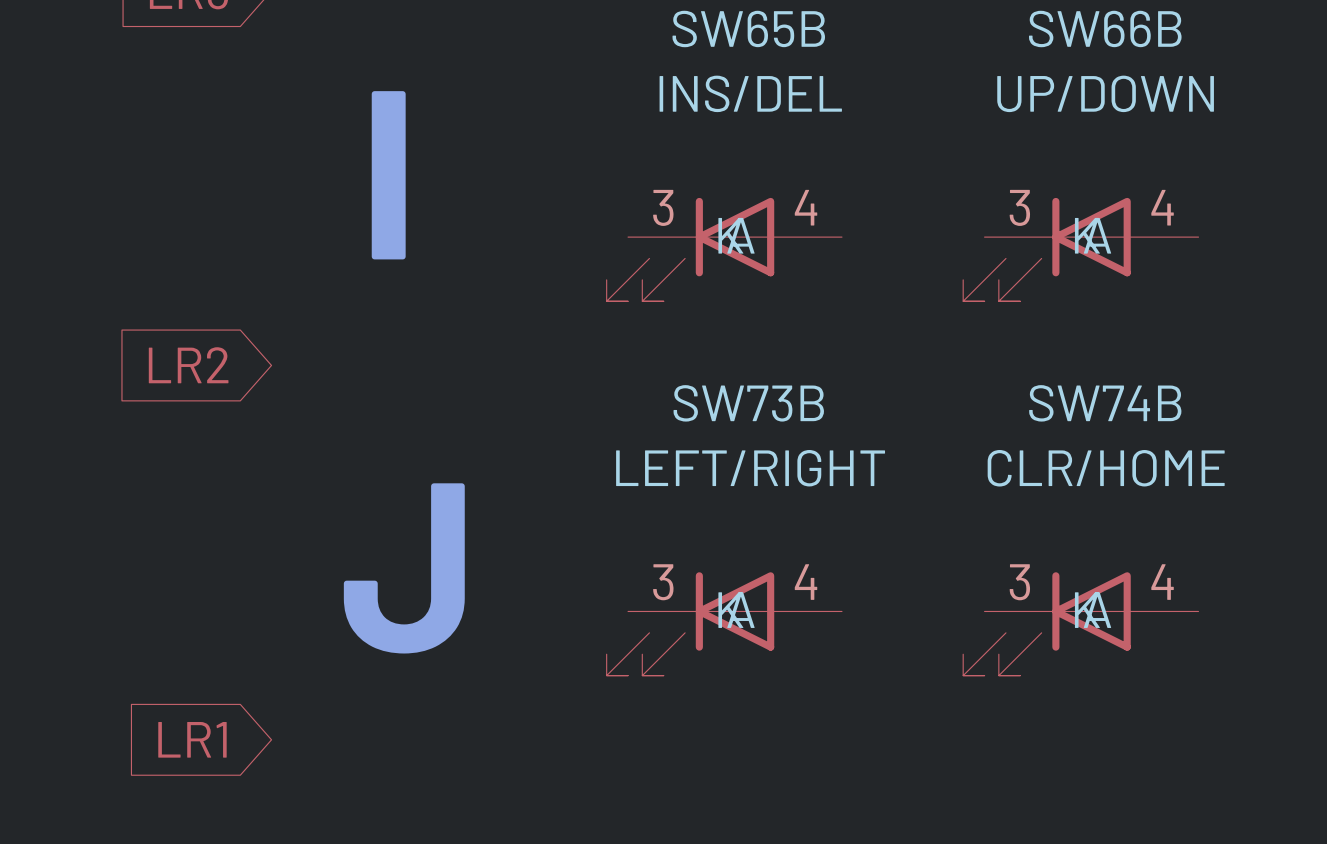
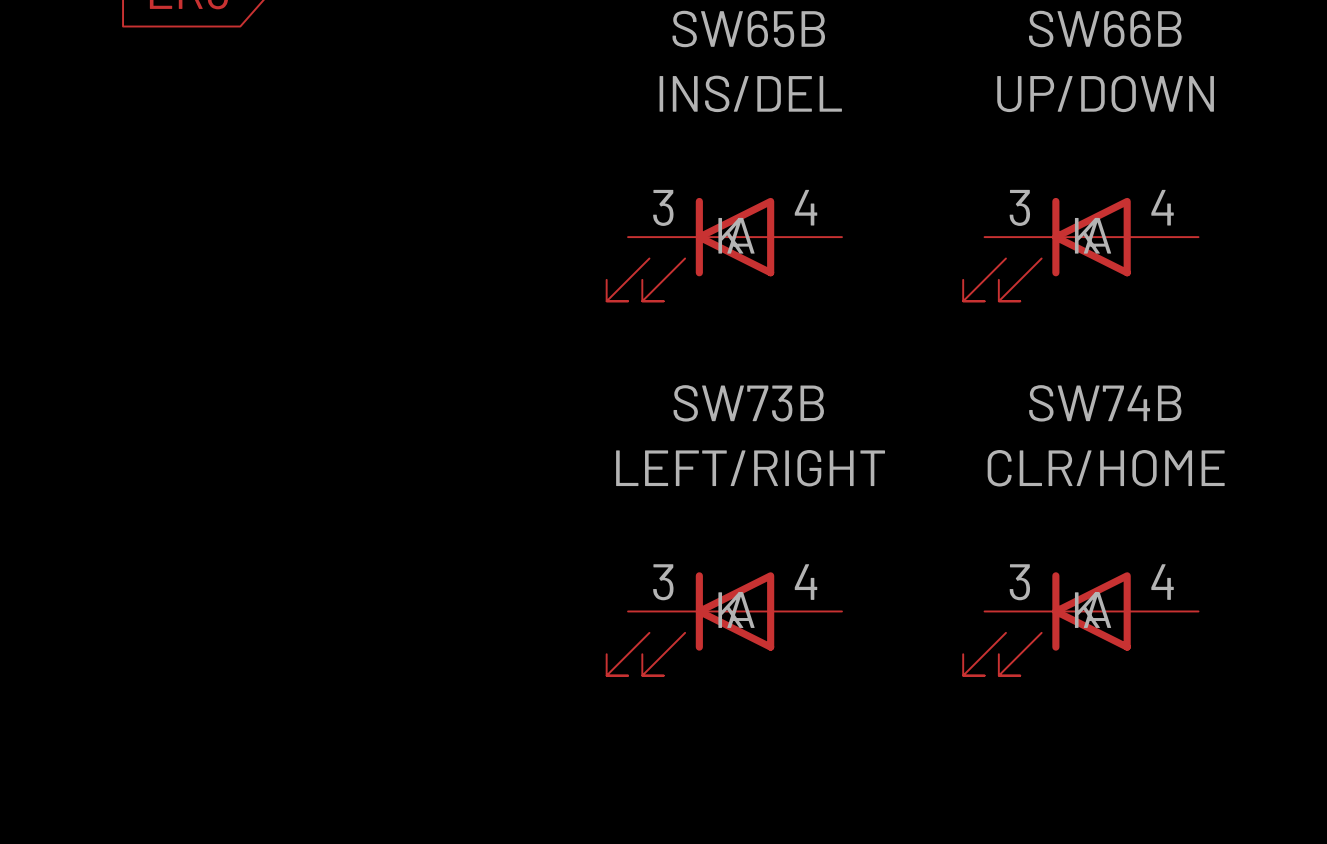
text: I (388, 175) -> none
global label: LR2 (188, 365) -> none
text: J (404, 568) -> none
global label: LR1 (192, 739) -> none

